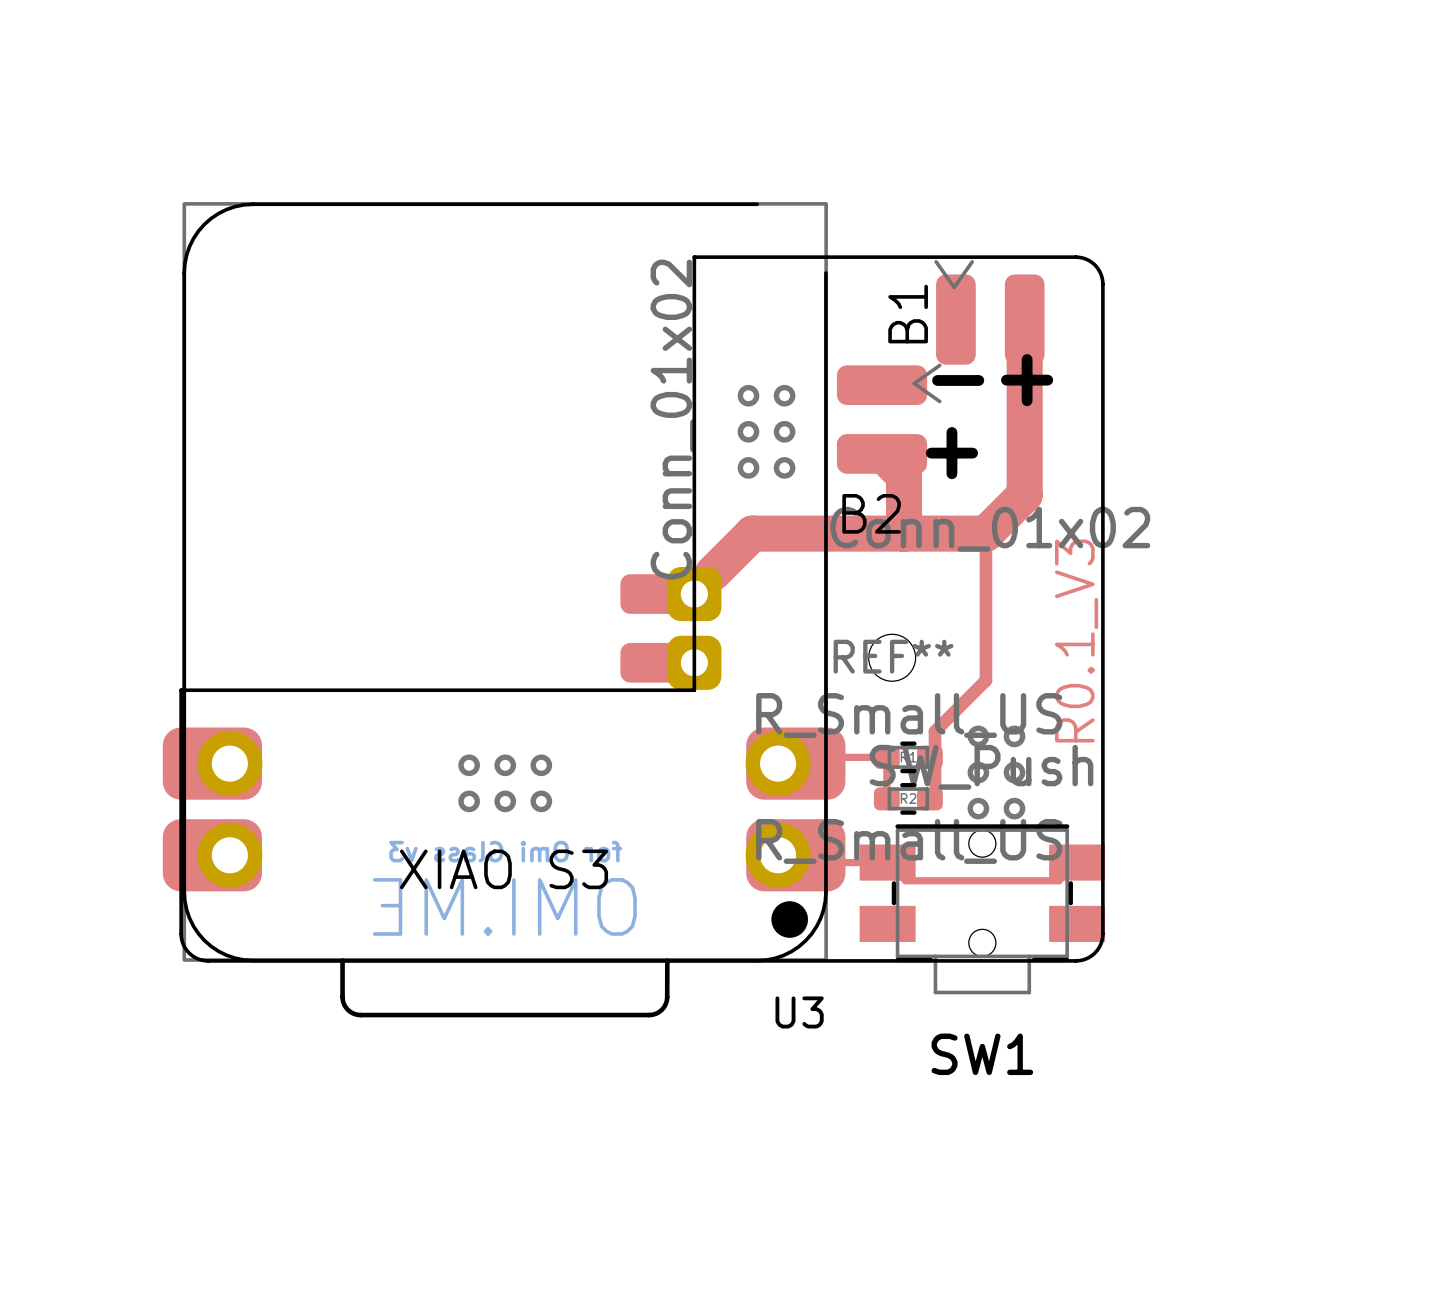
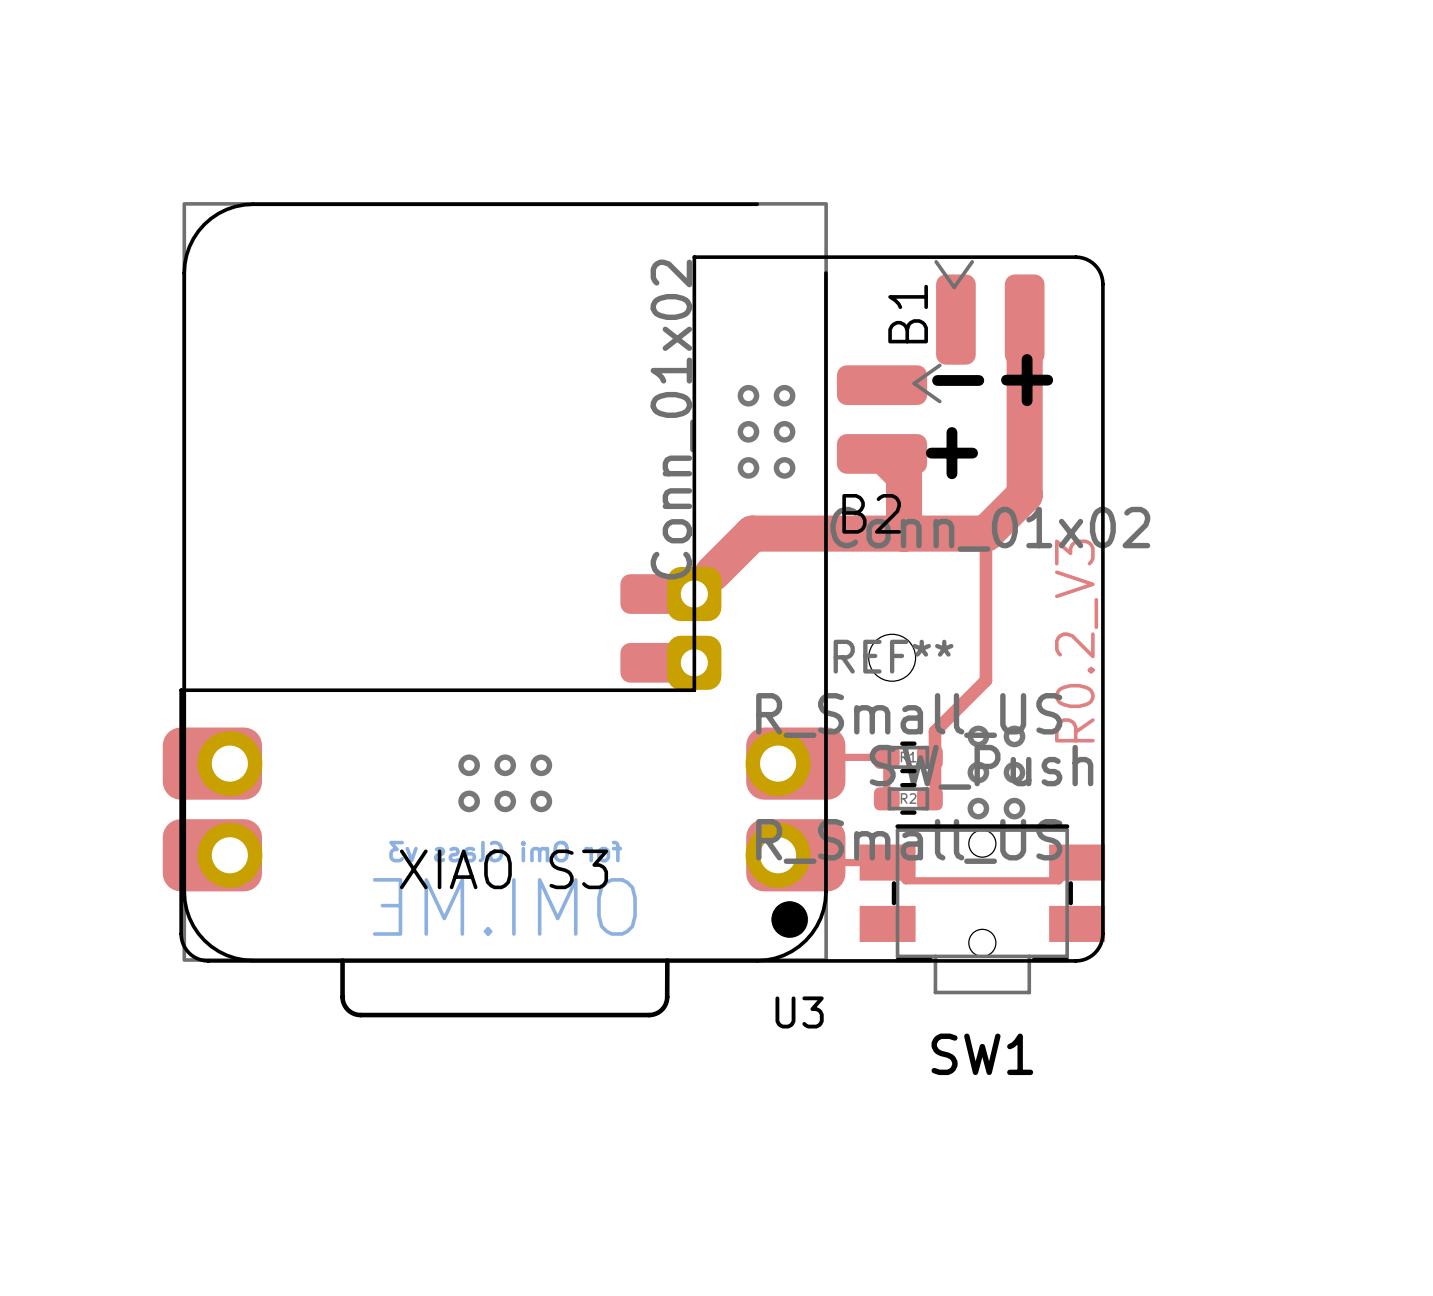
text: R0.1_V3 (1076, 641) -> R0.2_V3 (1076, 641)

